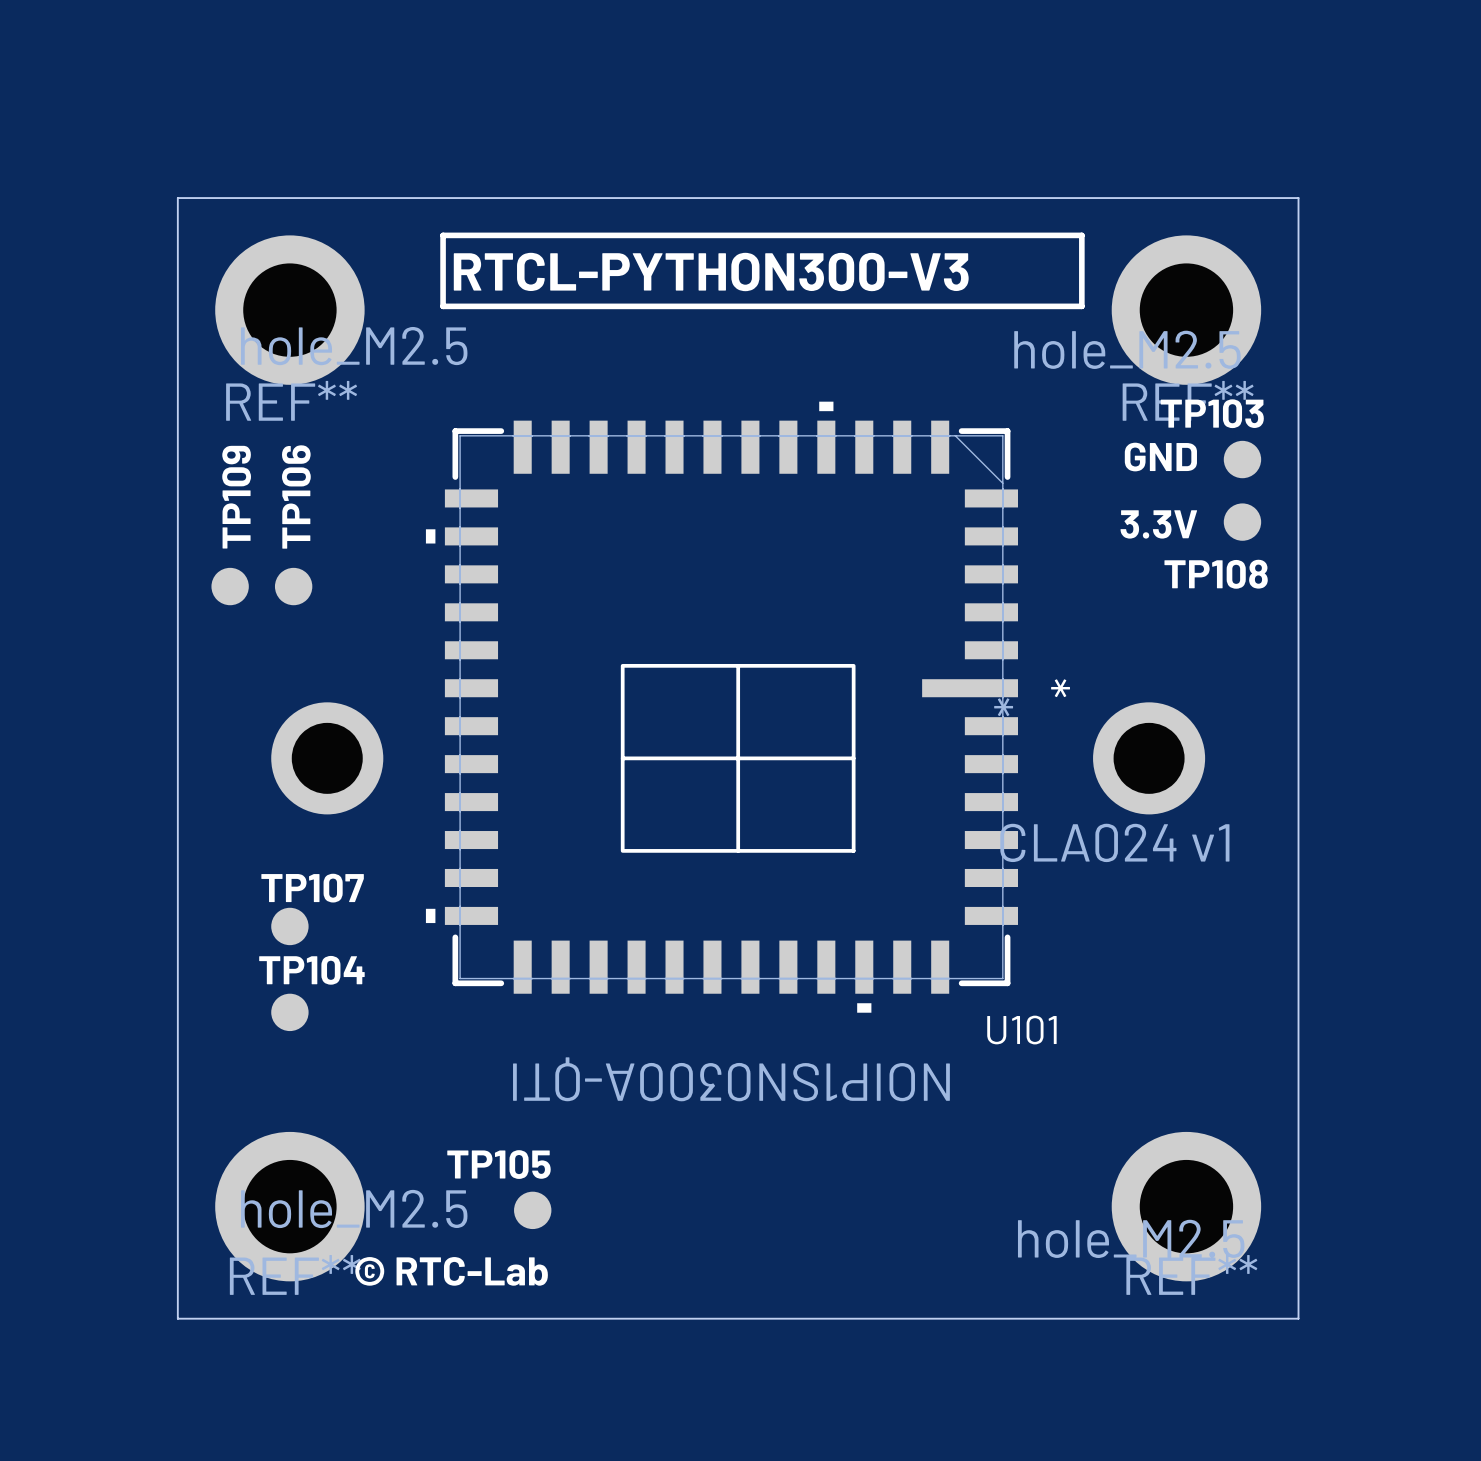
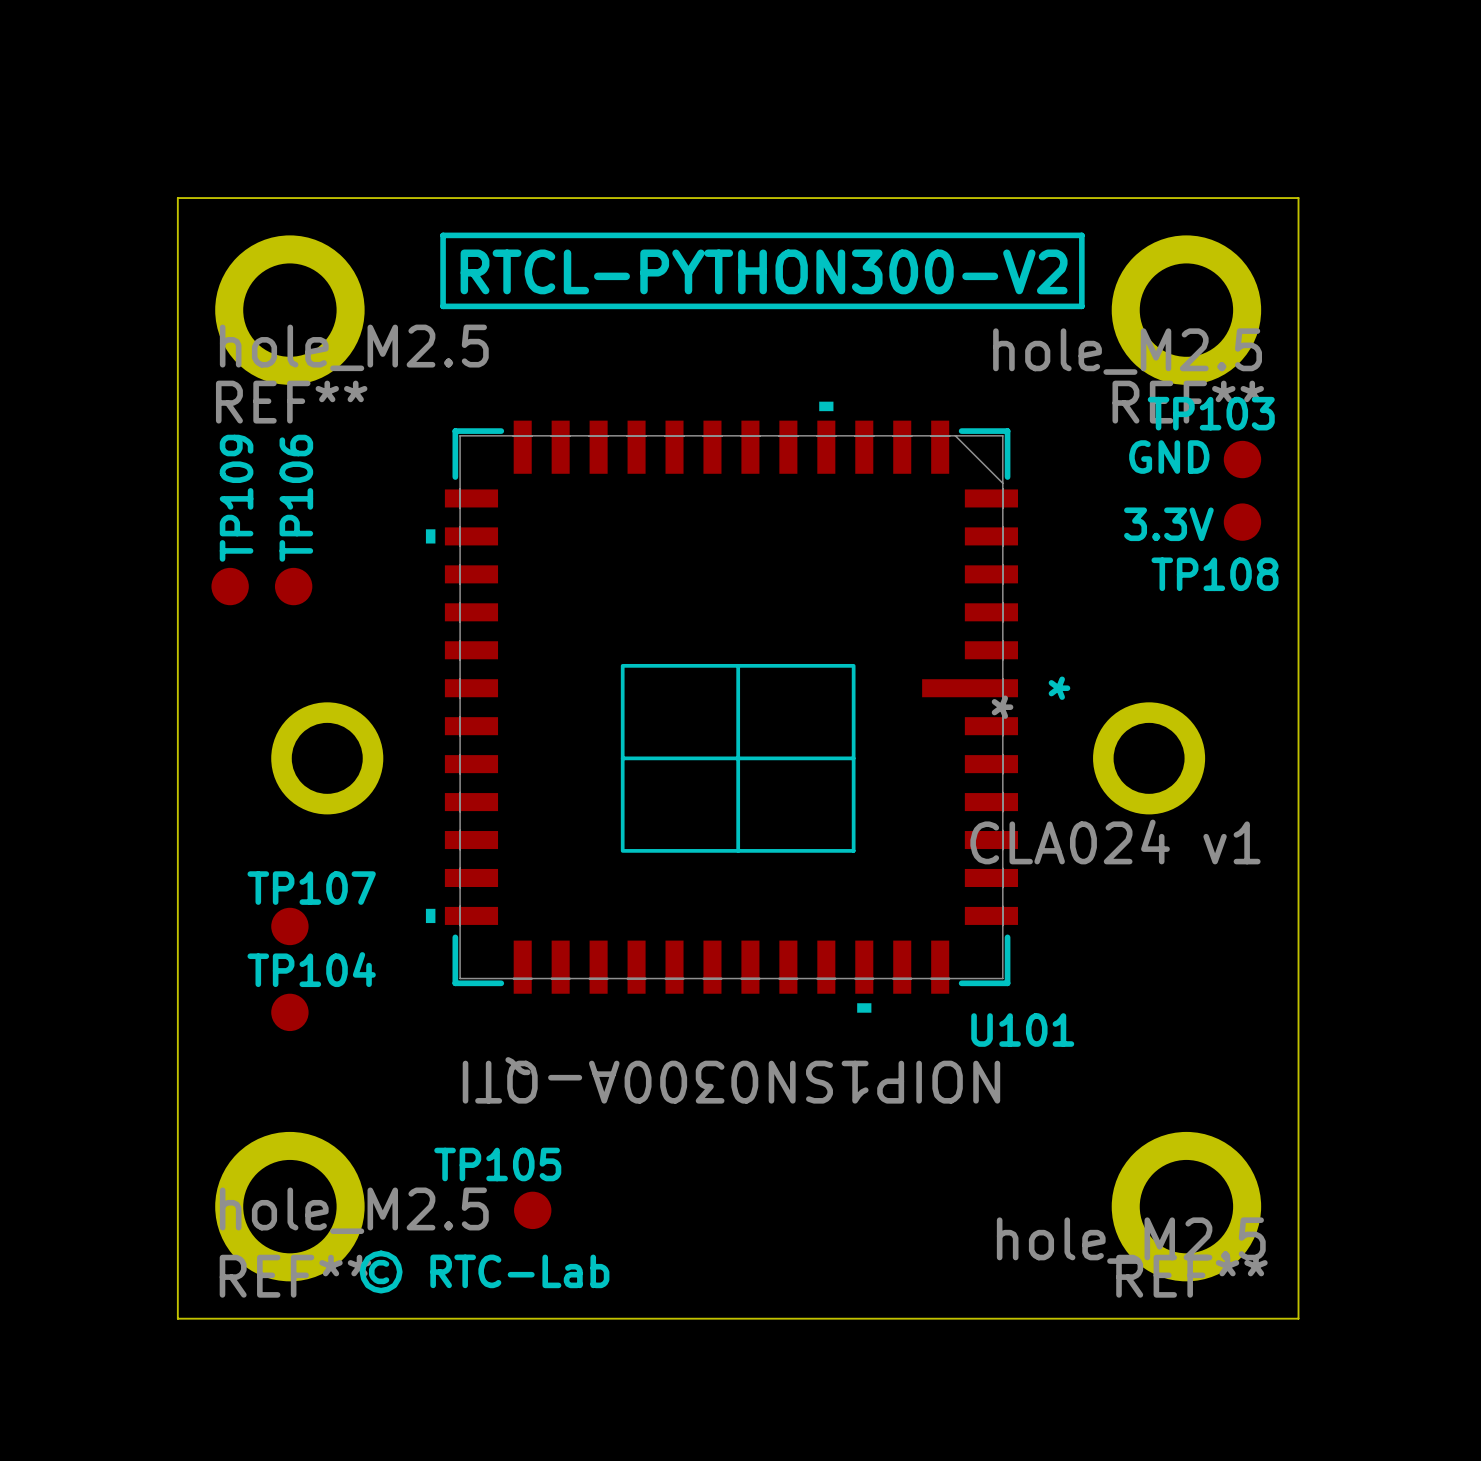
text: RTCL-PYTHON300-V3 (711, 271) -> RTCL-PYTHON300-V2 (764, 271)

